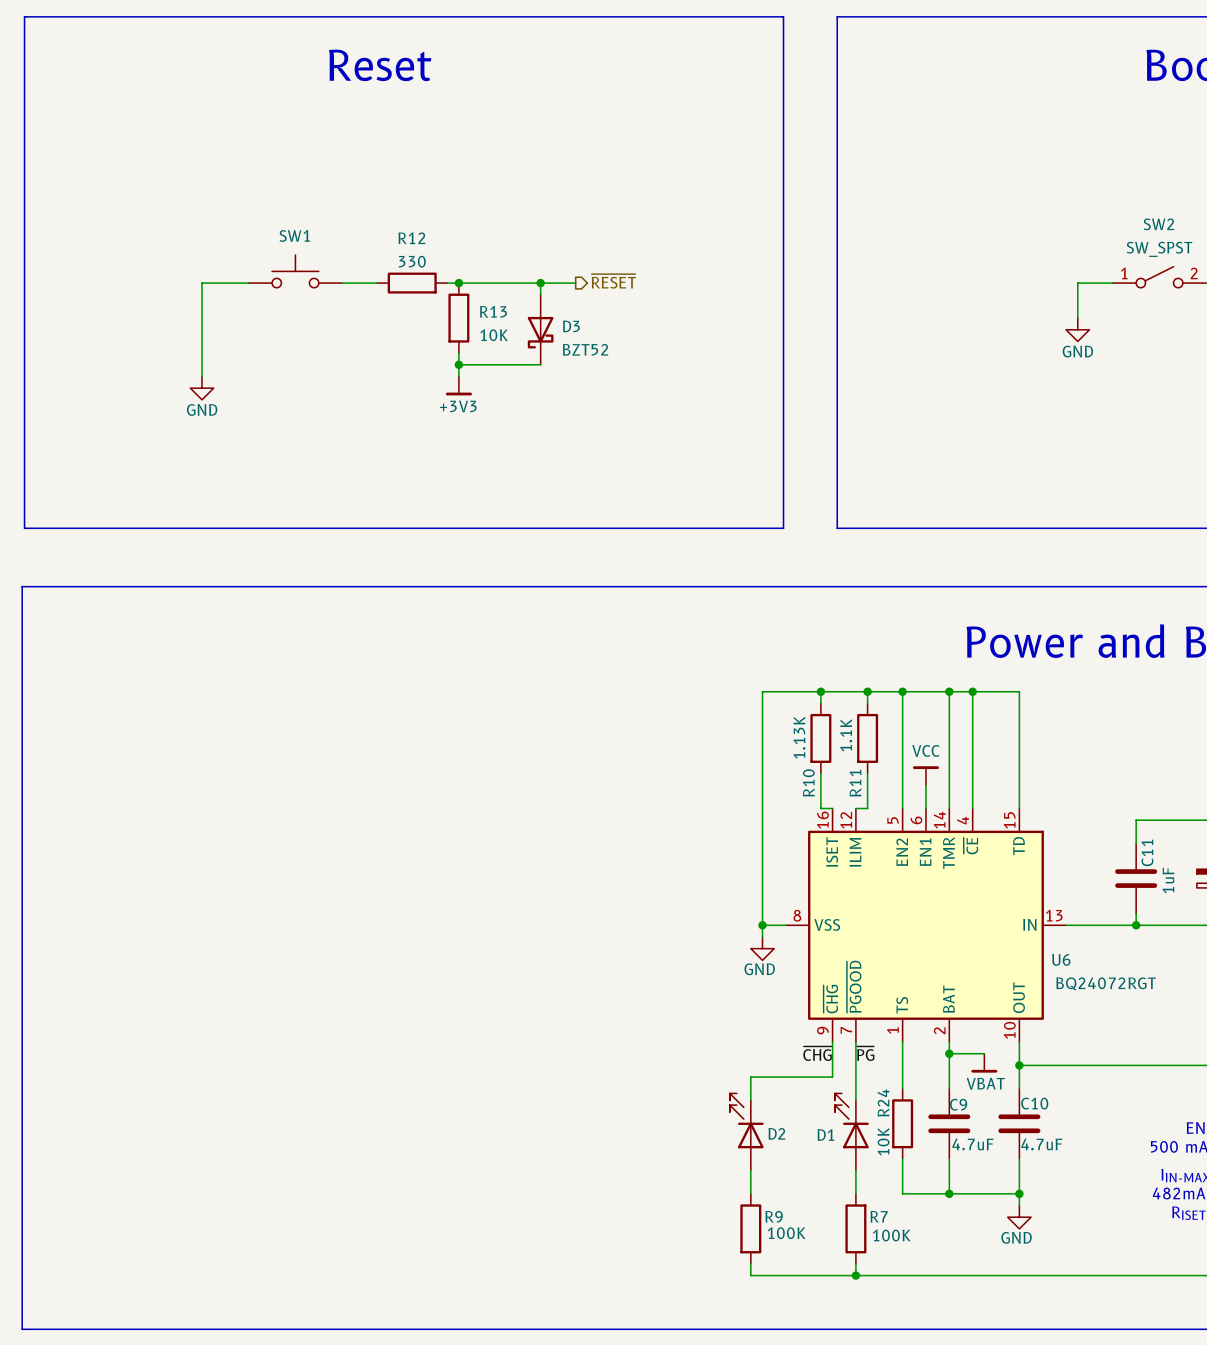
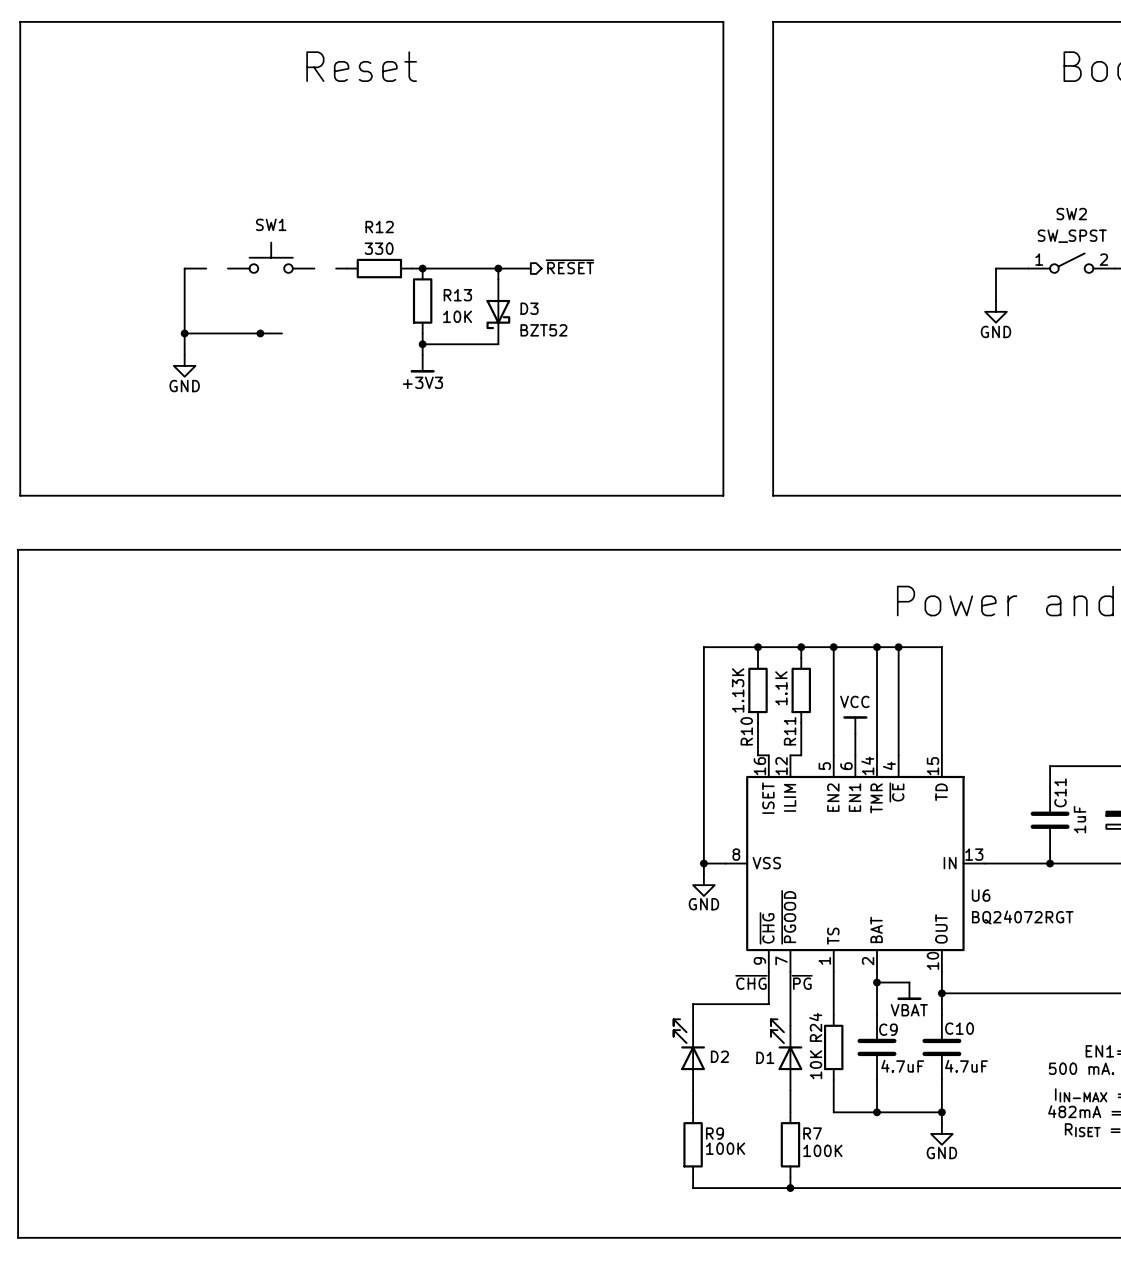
wire: (225, 283) (248, 283) -> none
wire: (342, 283) (365, 283) -> none
wire: none -> (184, 333) (282, 333)
junction: none -> (184, 333)
junction: none -> (260, 333)

